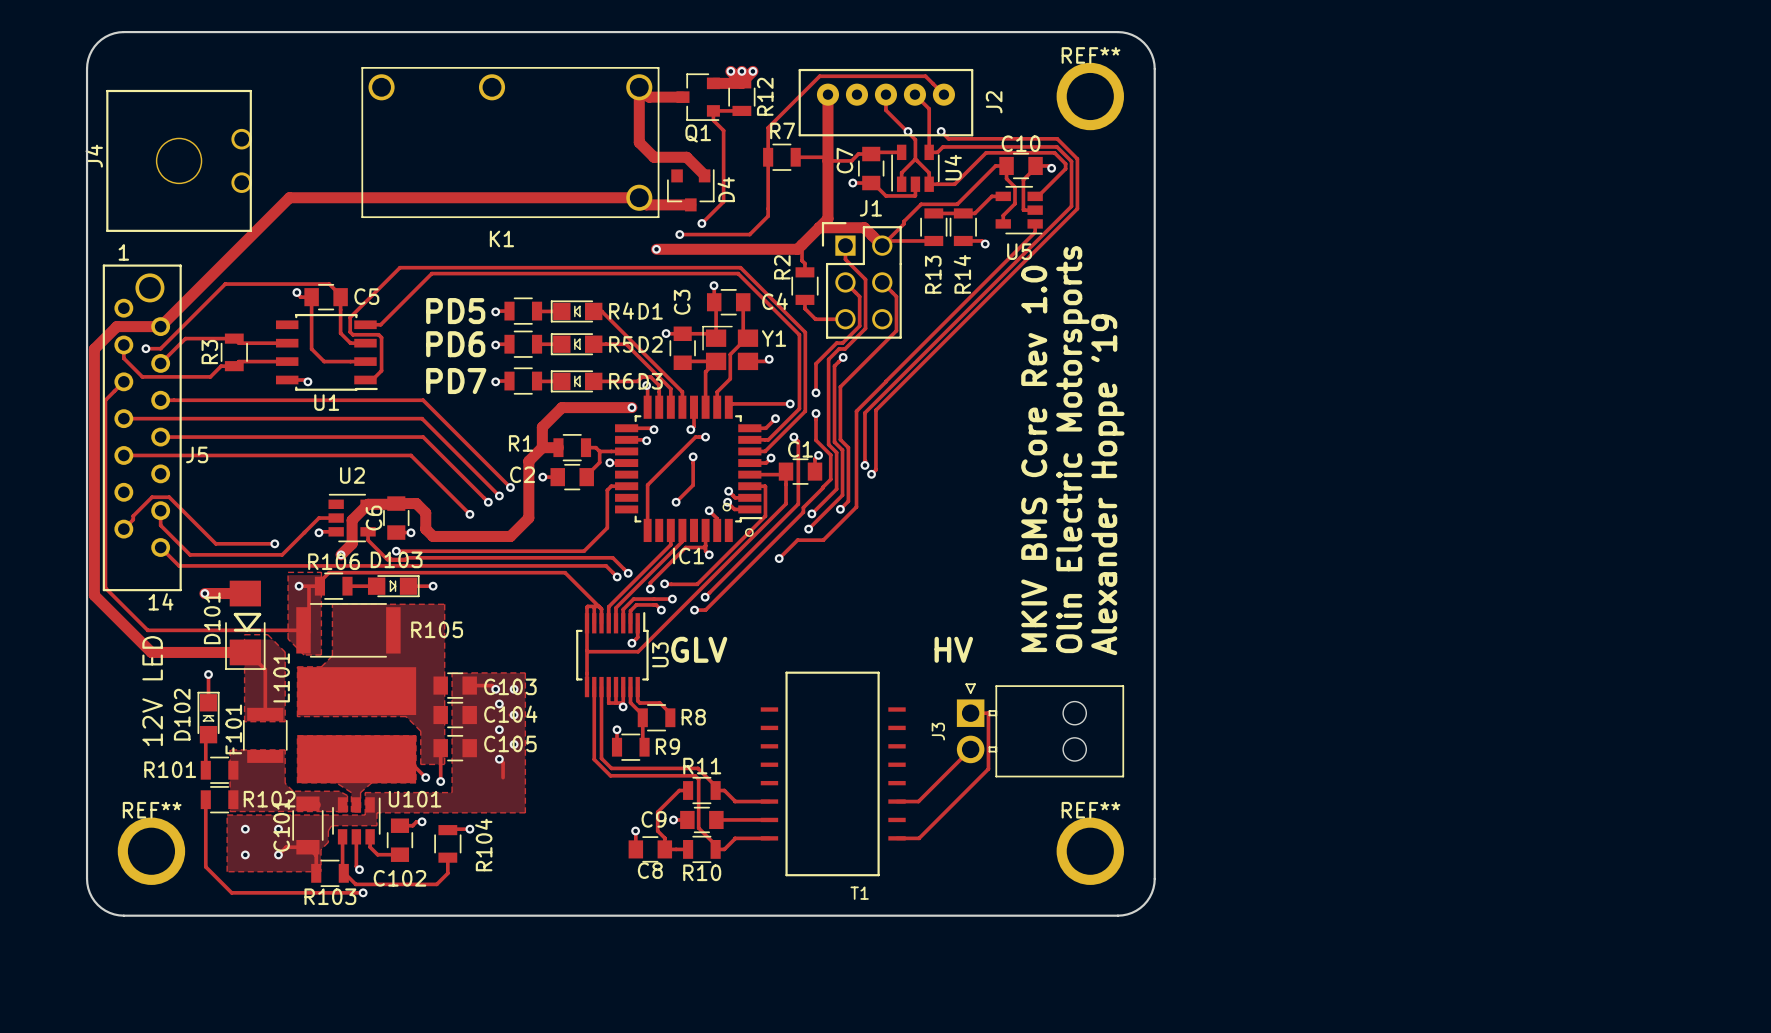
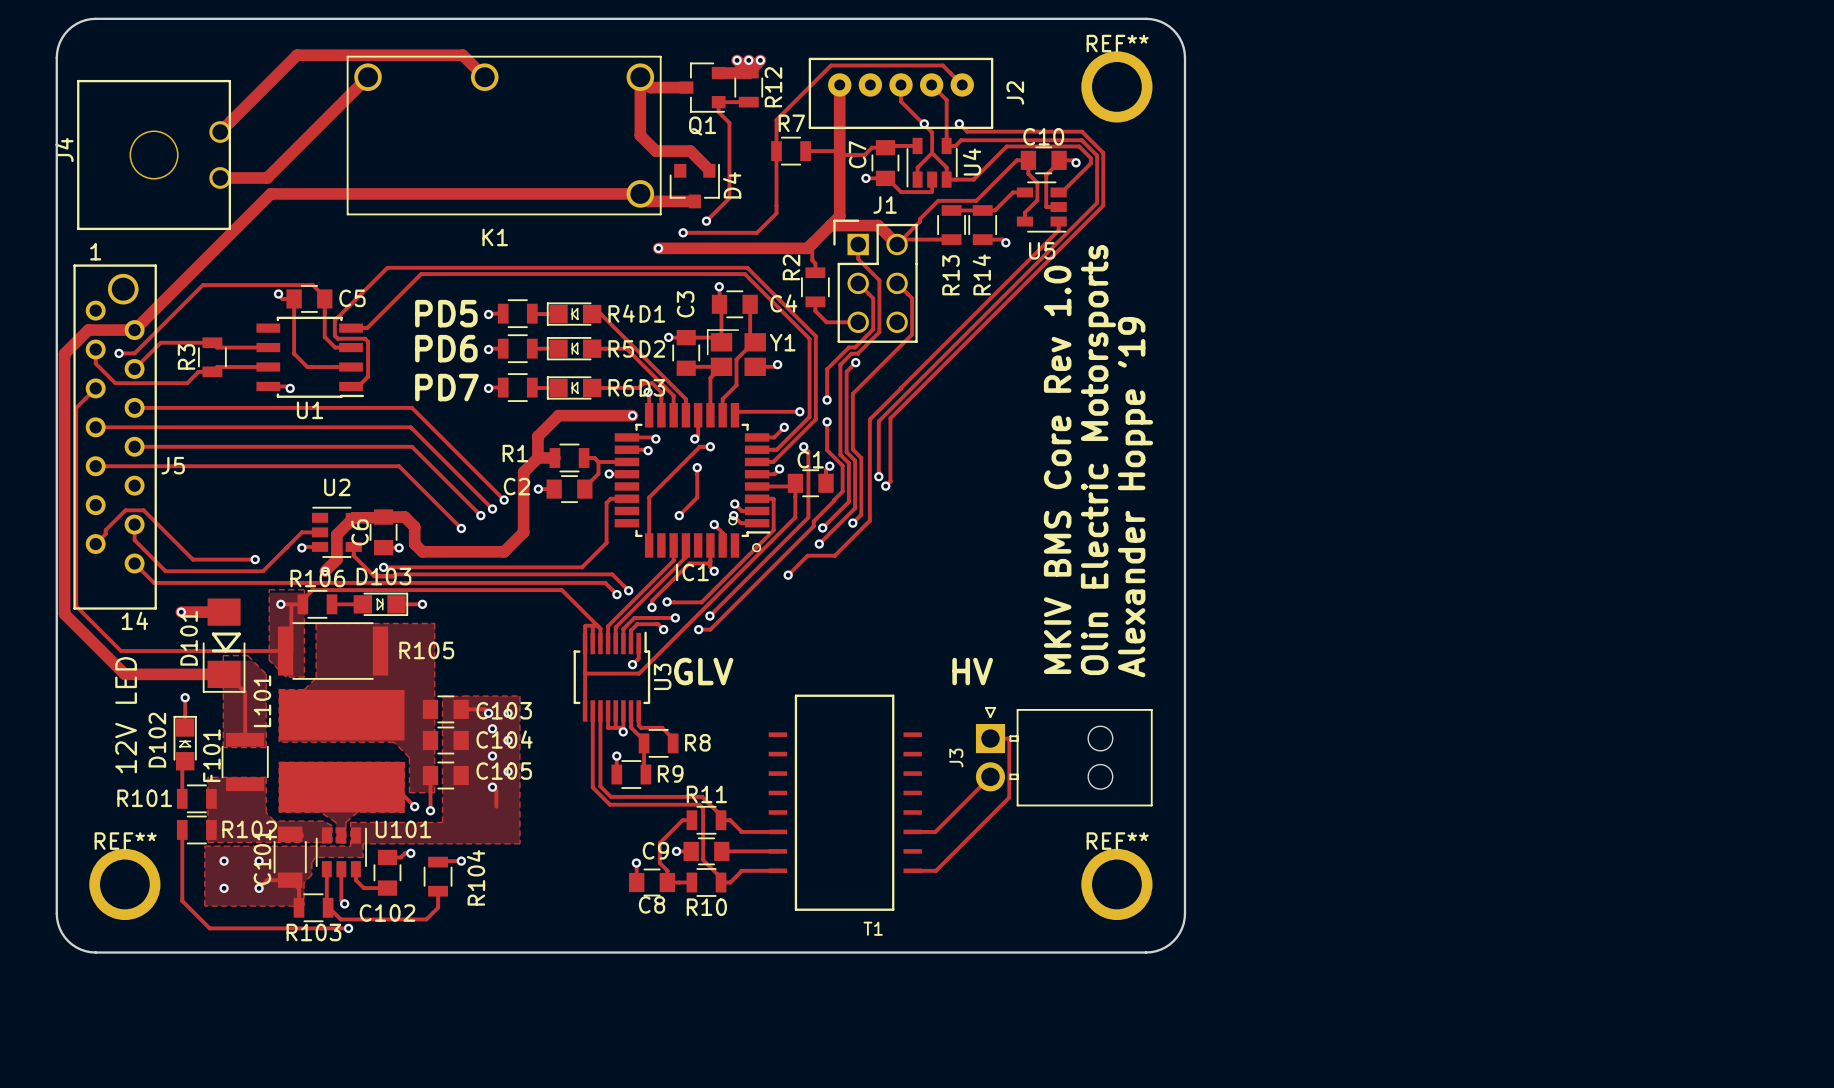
track: none -> (368, 77) (267, 177) (220, 177)
track: none -> (484, 77) (462, 55) (297, 55) (220, 132)

